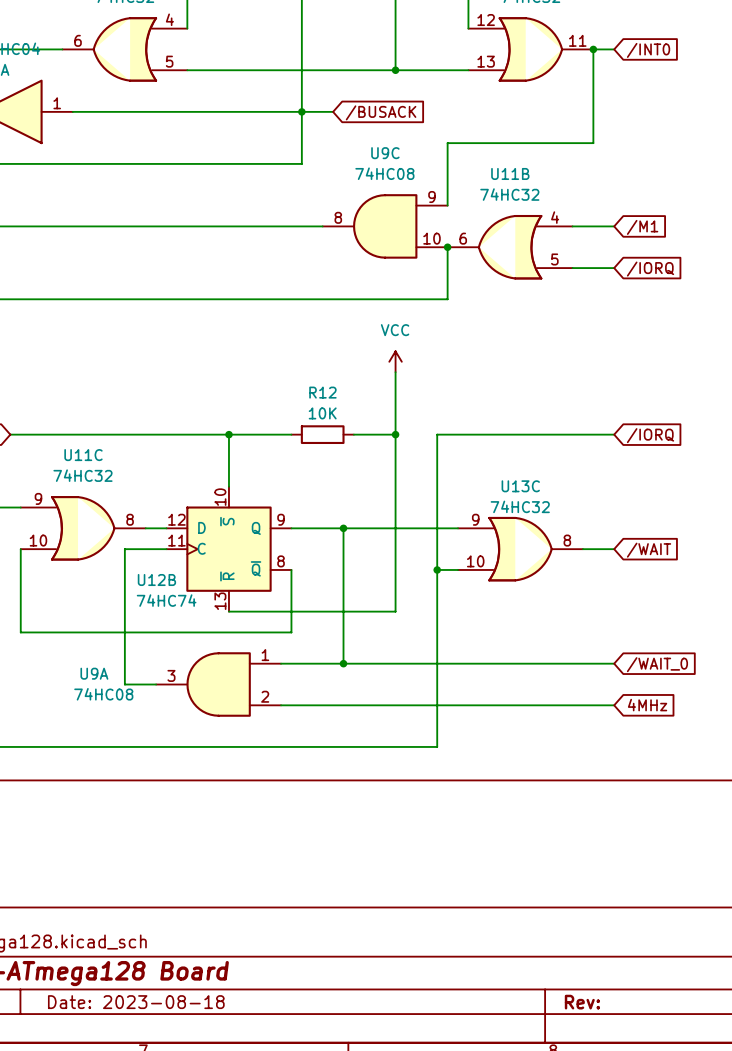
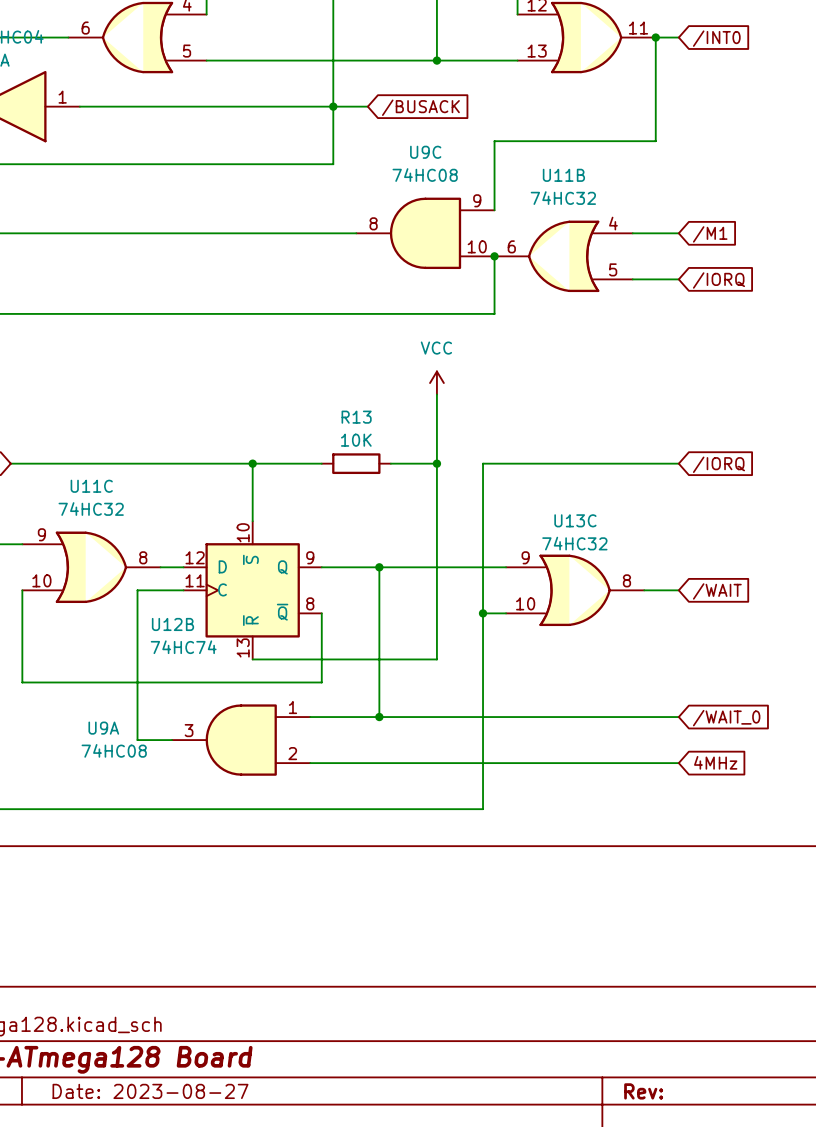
R12 name: R12 (322, 392) -> R13 (356, 417)
title block: Date: 2023-08-18 (136, 1002) -> Date: 2023-08-27 (150, 1091)

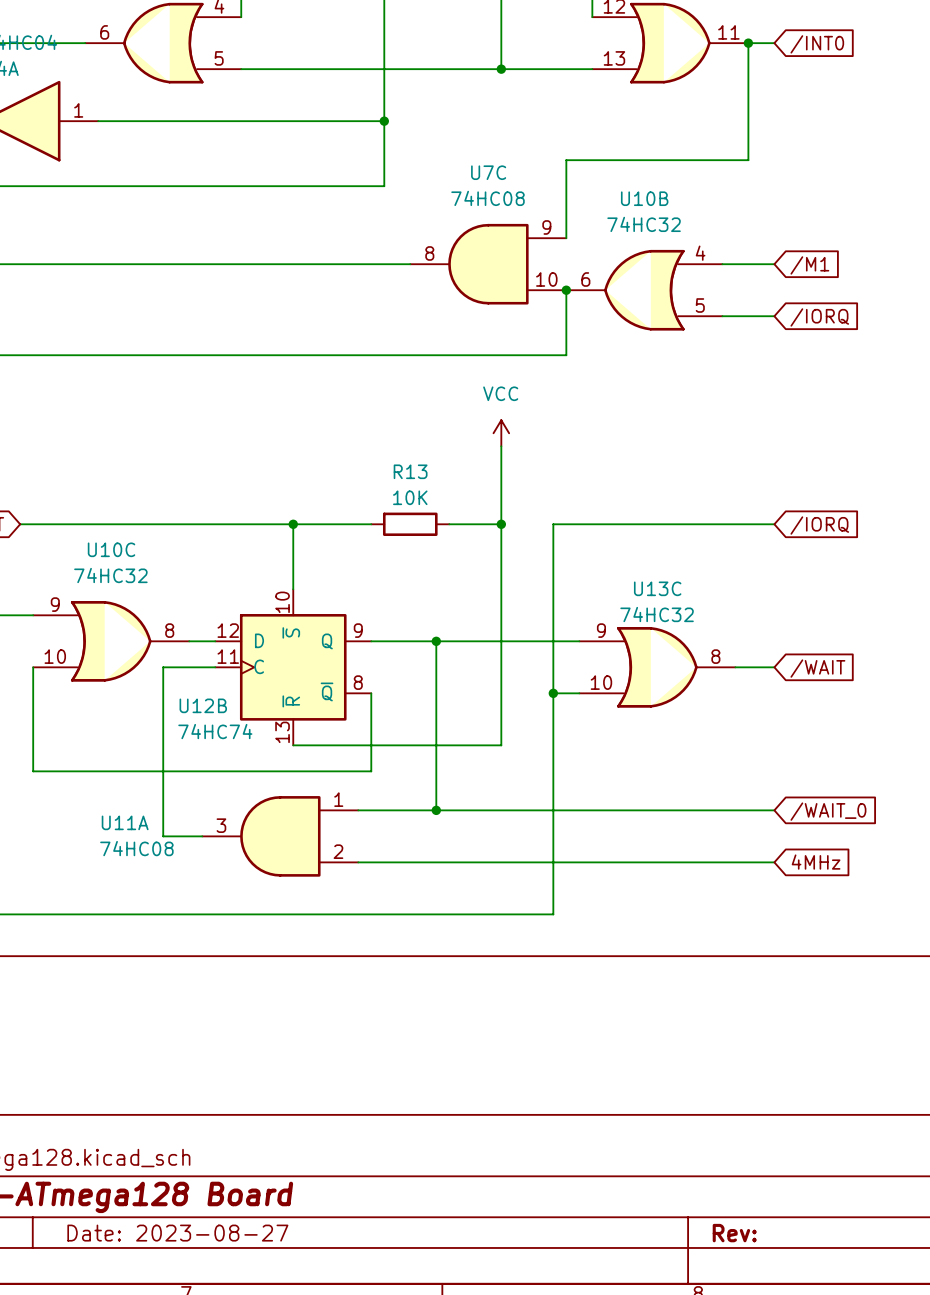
wire: (333, 106) (367, 106) -> none
global label: /BUSACK (420, 107) -> none
U9C name: U9C (425, 152) -> U7C (488, 172)
U11B name: U11B (563, 175) -> U10B (644, 198)
U11C name: U11C (91, 486) -> U10C (111, 549)
U9A name: U9A (103, 728) -> U11A (125, 822)

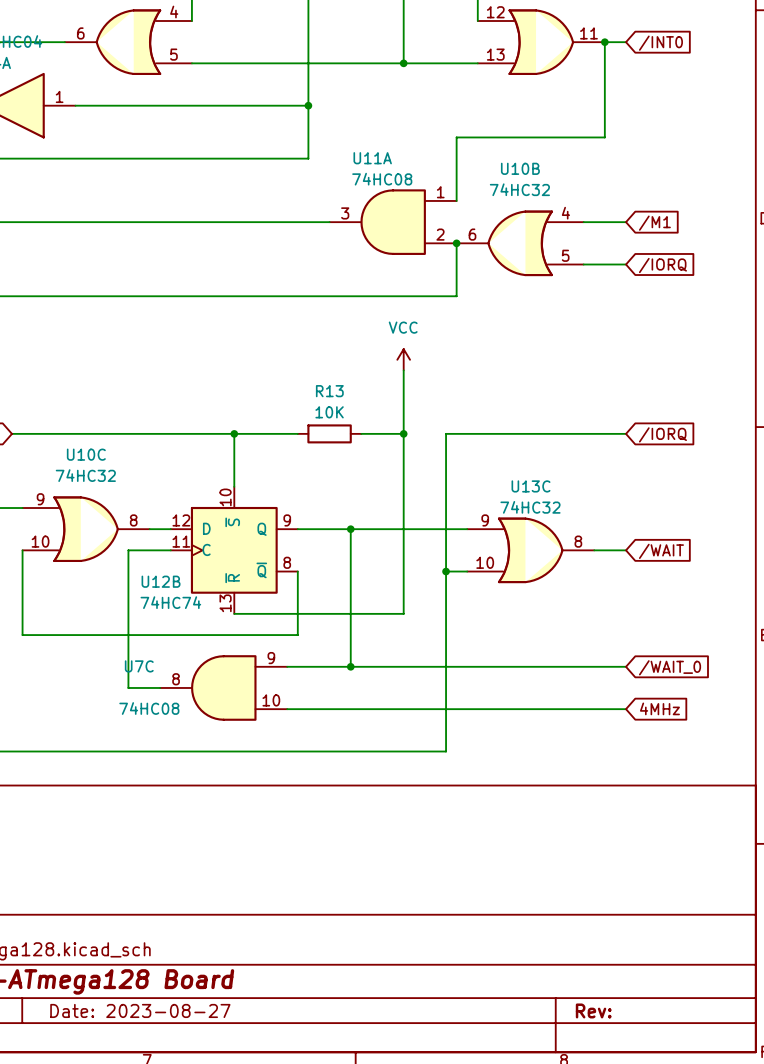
U7C name position: U7C (488, 172) -> U7C (139, 666)
U7C value position: 74HC08 (488, 198) -> 74HC08 (149, 708)
U7C position: (488, 264) -> (223, 687)
U11A name position: U11A (125, 822) -> U11A (372, 158)
U11A position: (280, 836) -> (393, 222)
U11A value position: 74HC08 (136, 848) -> 74HC08 (382, 179)

